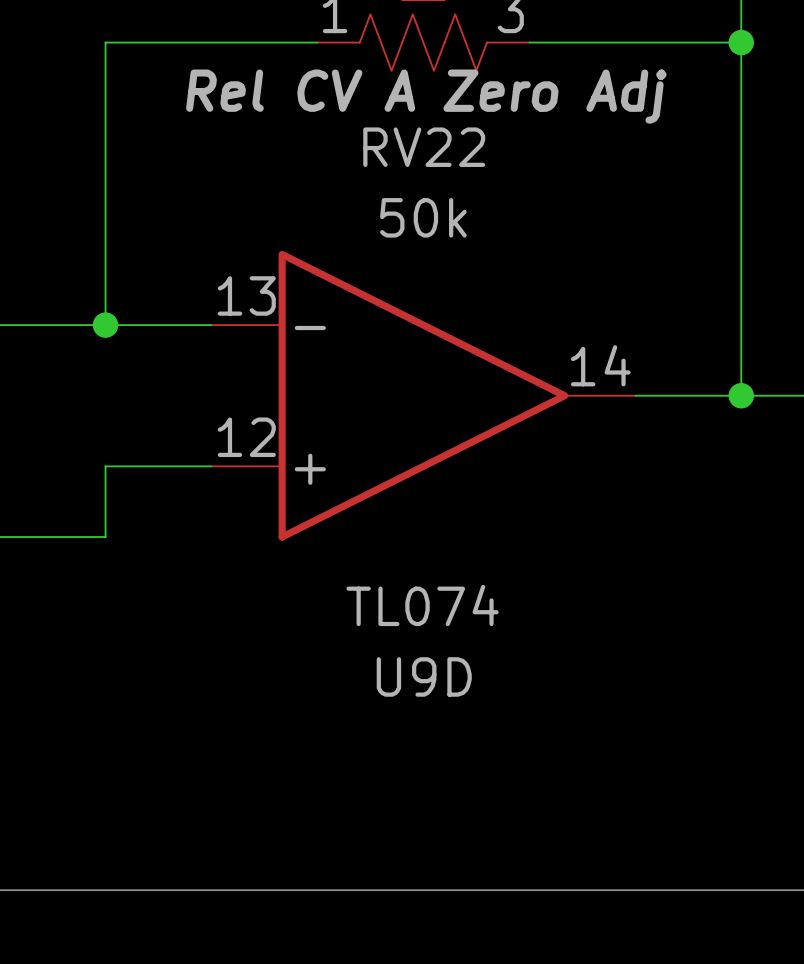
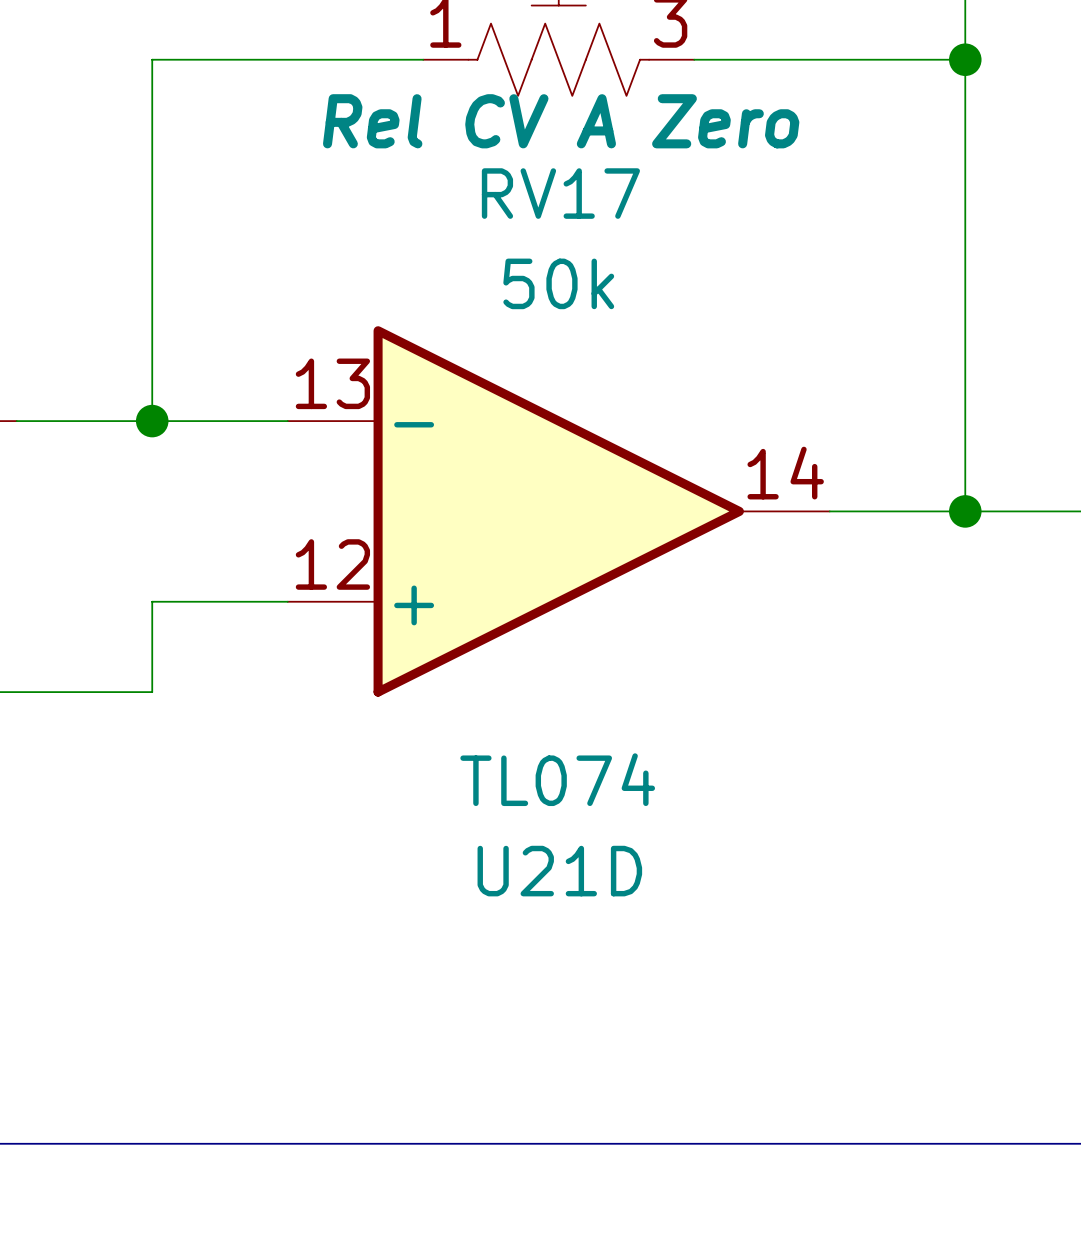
RV22 text: Rel CV A Zero Adj (426, 96) -> Rel CV A Zero (561, 121)
RV22 name: RV22 (424, 147) -> RV17 (560, 193)
U9D name: U9D (424, 676) -> U21D (559, 871)

